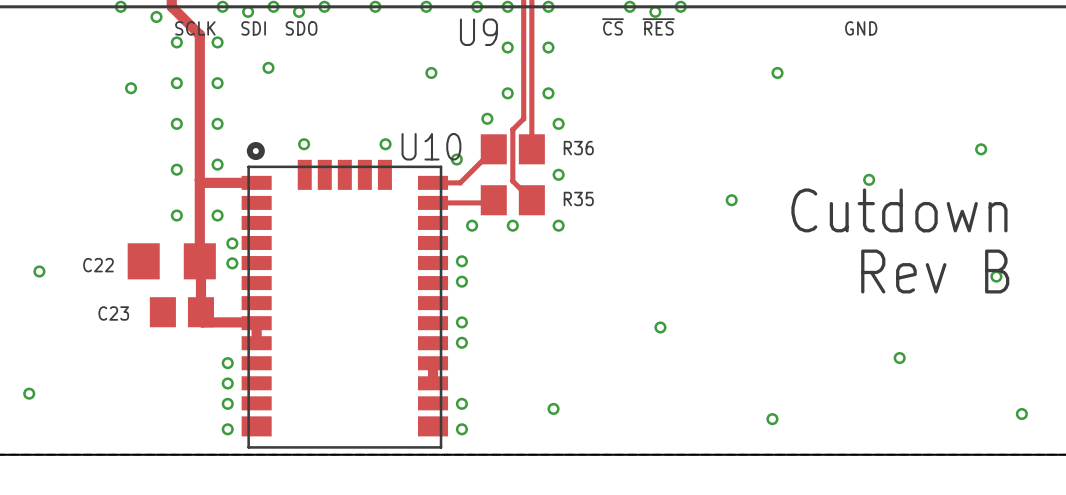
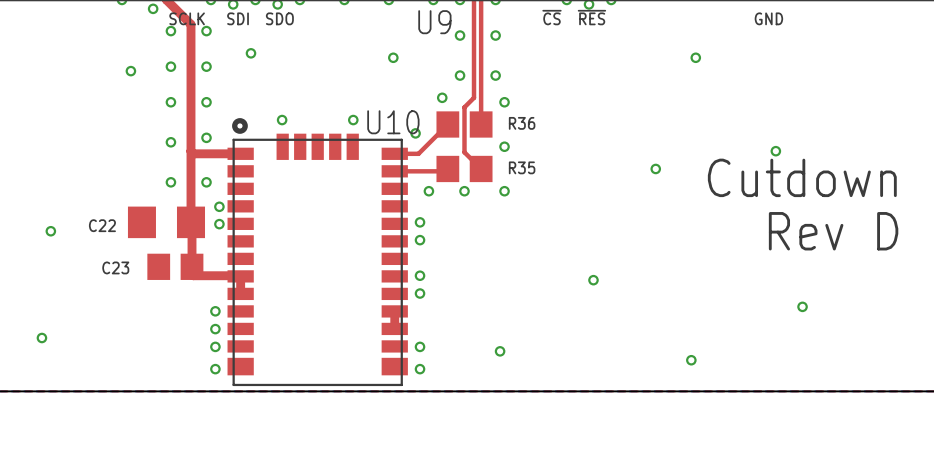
via: (981, 149) -> none
text: Rev B (935, 271) -> Rev D (833, 231)
via: (996, 276) -> none
via: (1021, 414) -> none

